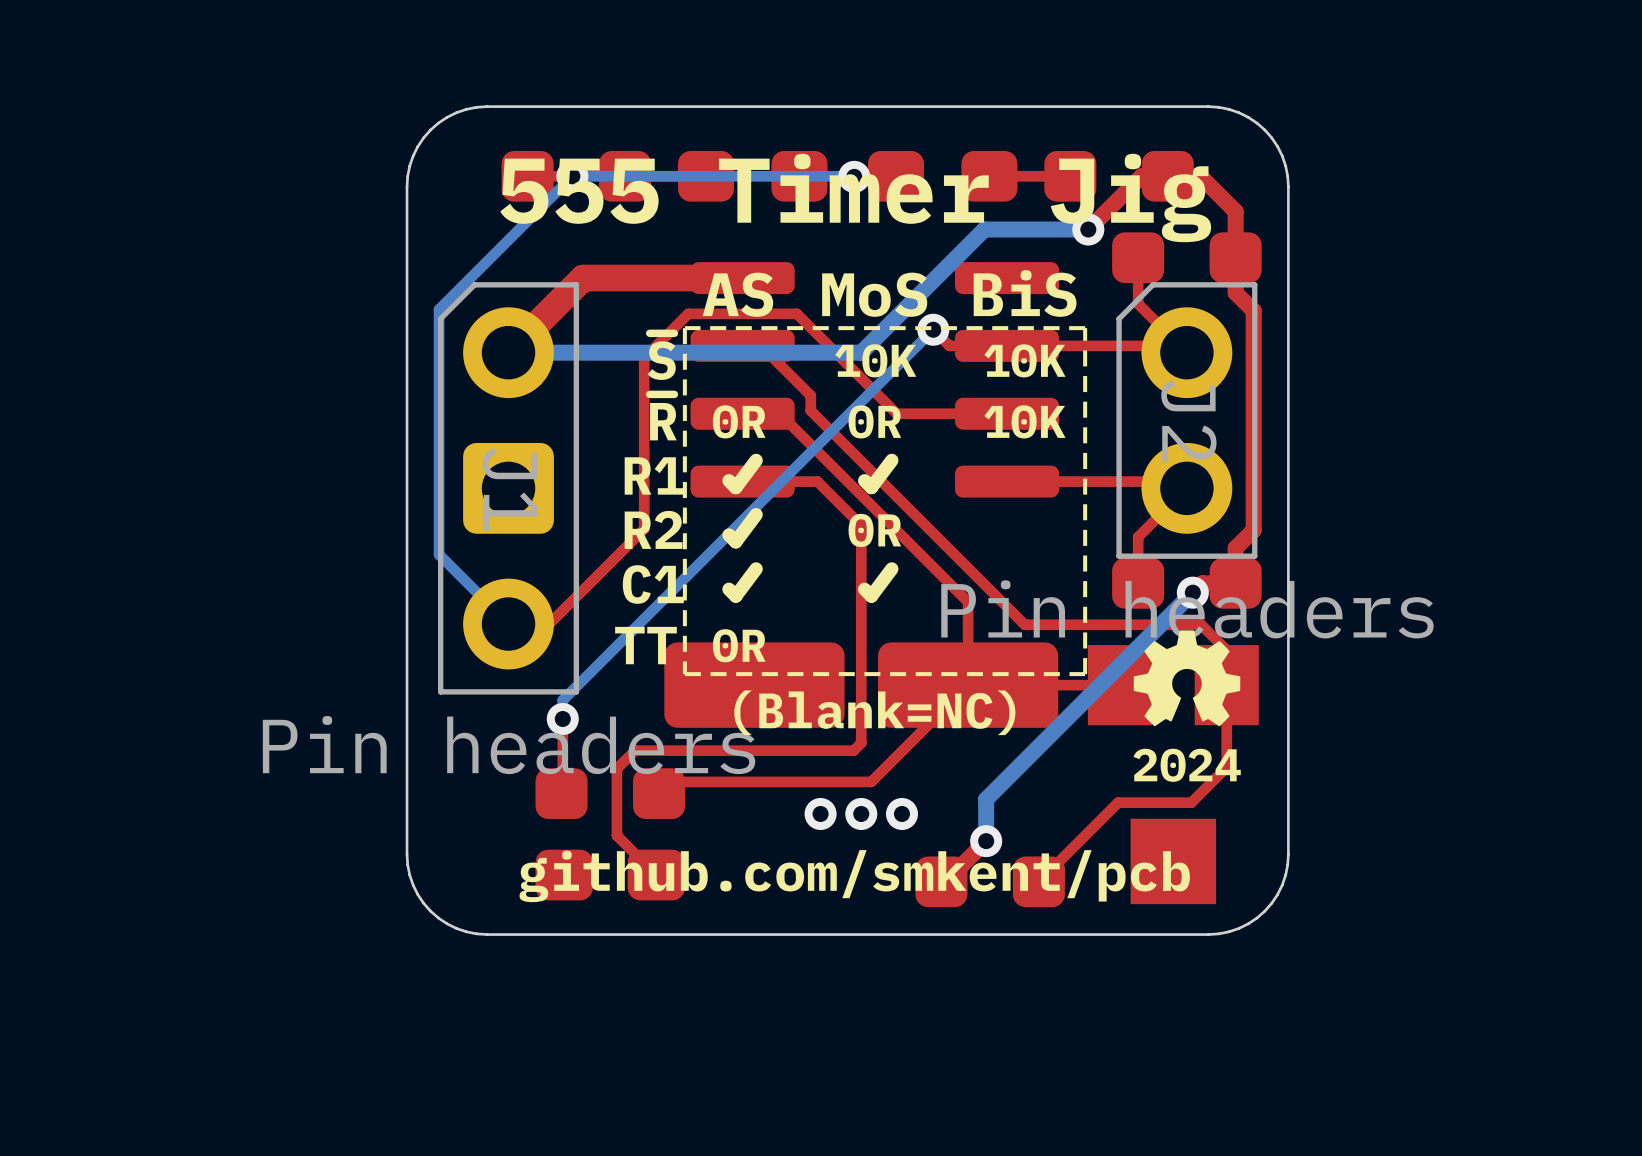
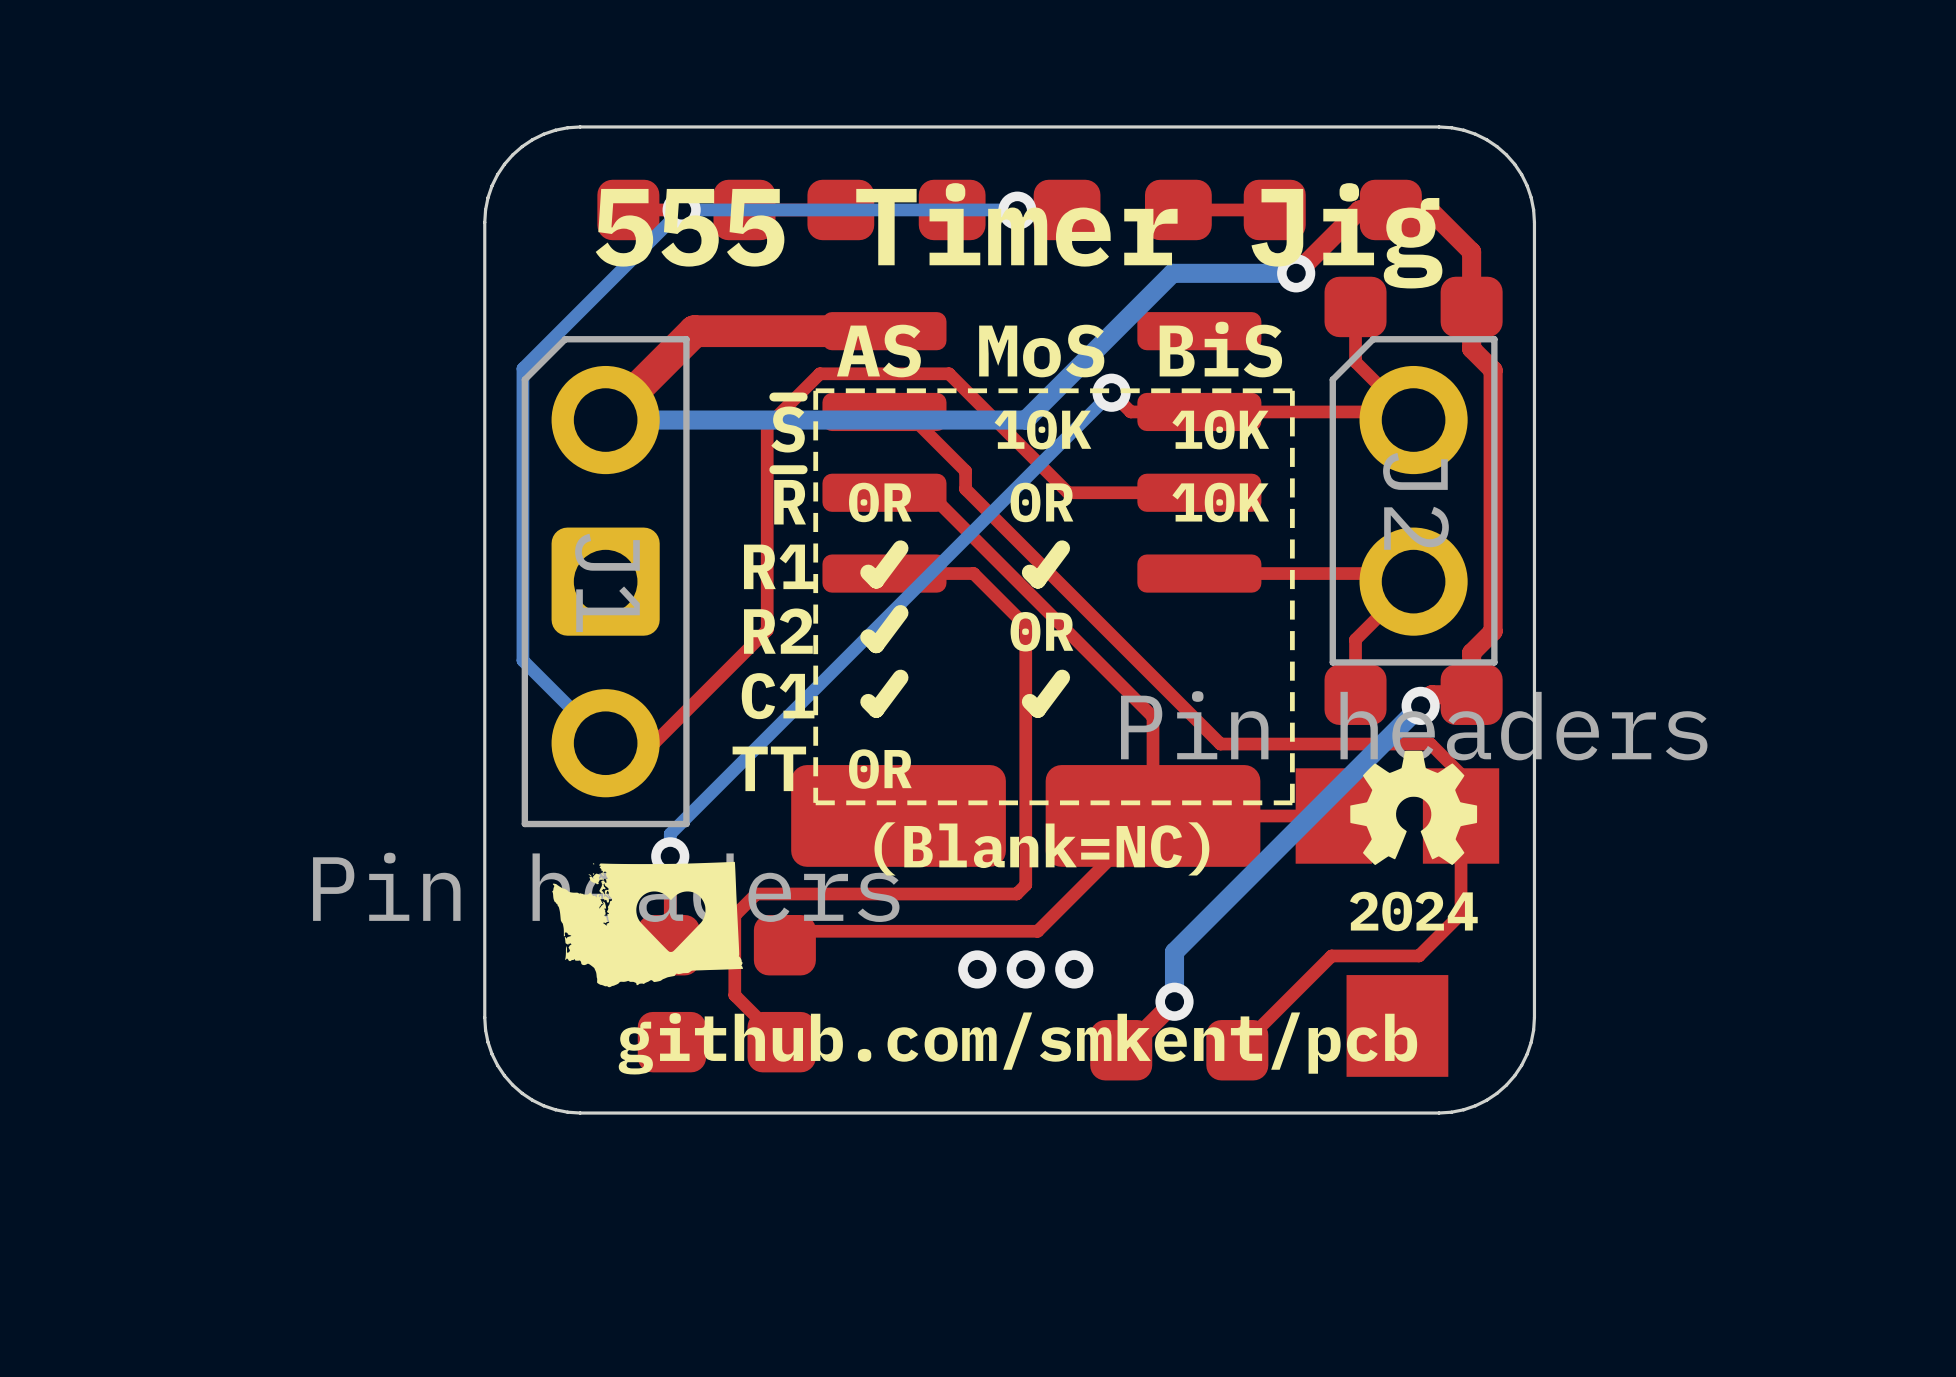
drawing: none -> [552, 861, 744, 988]

